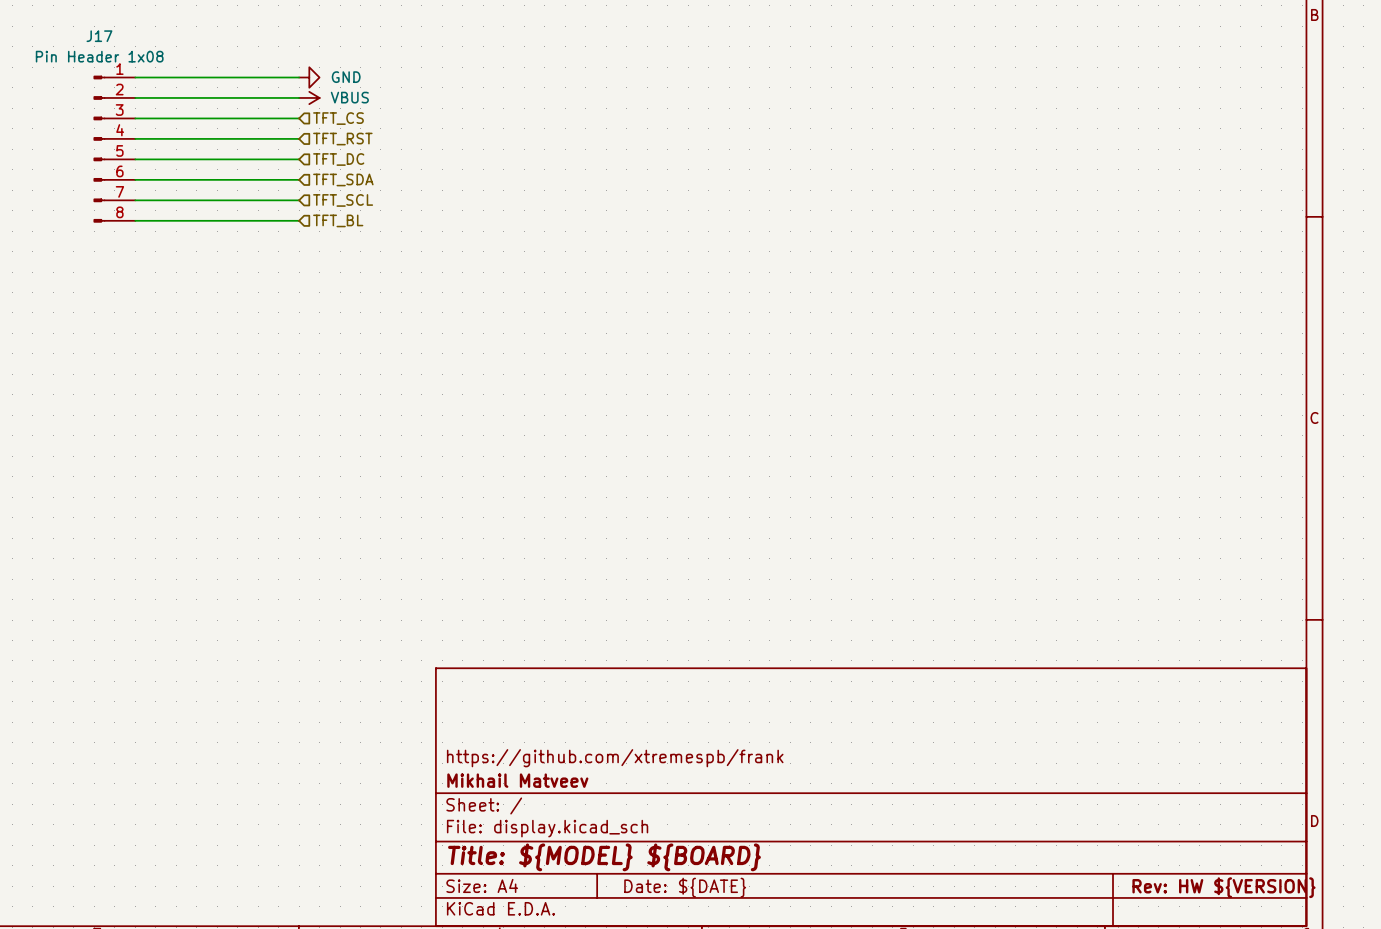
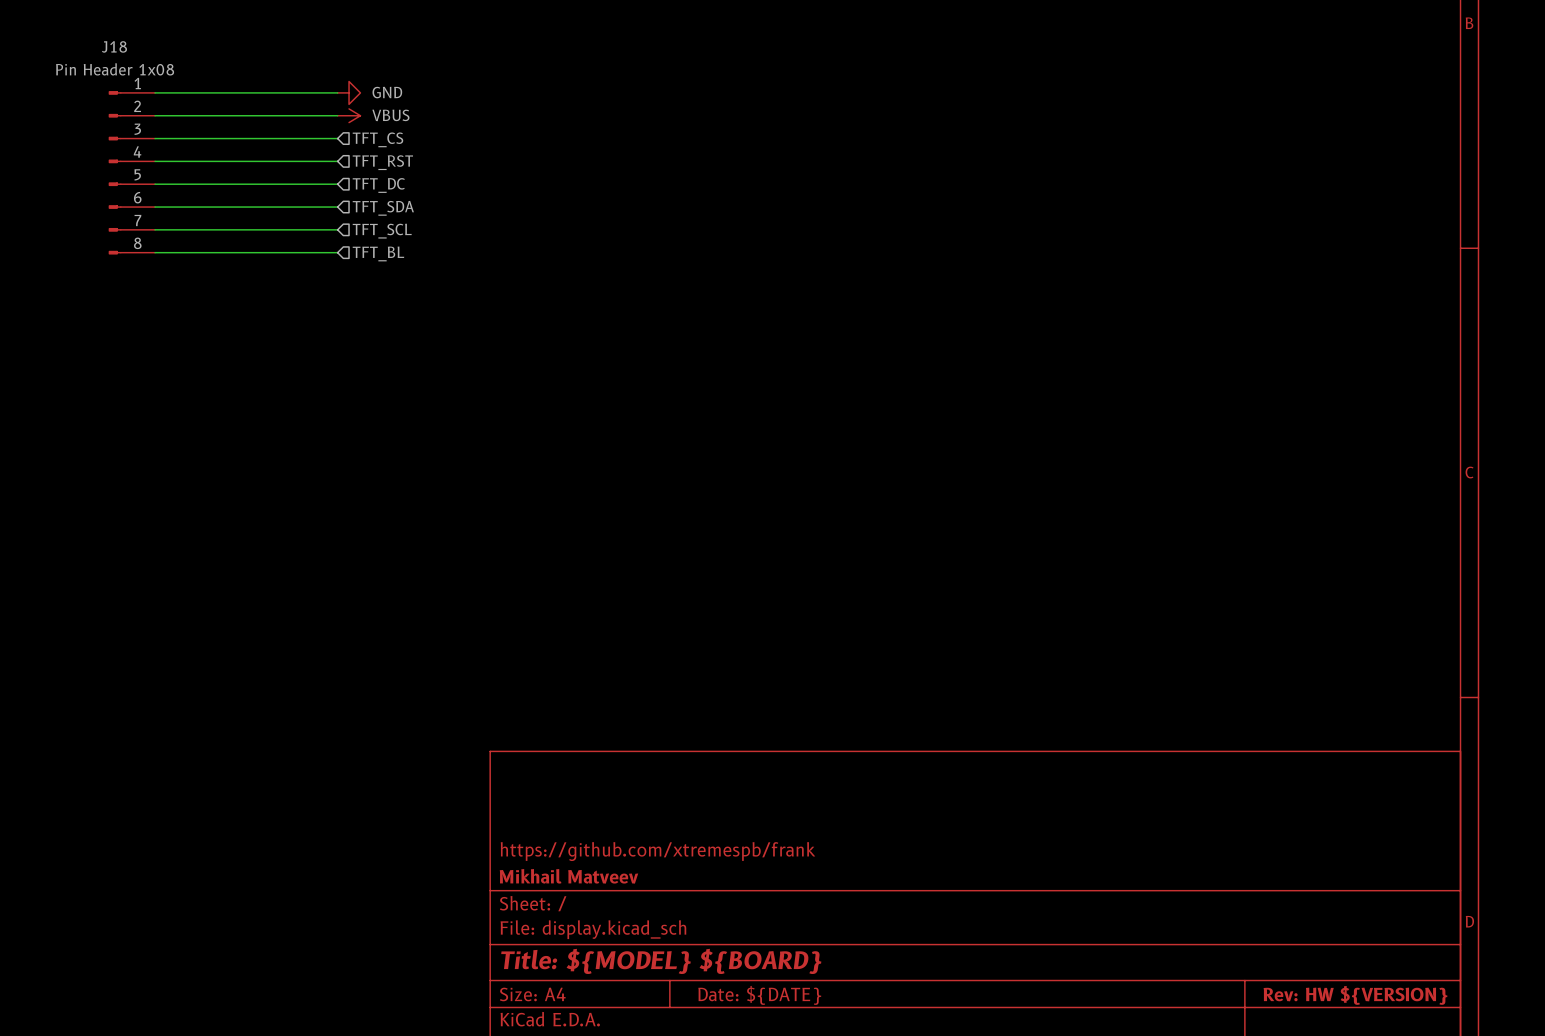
J17 name: J17 (99, 36) -> J18 (114, 46)

